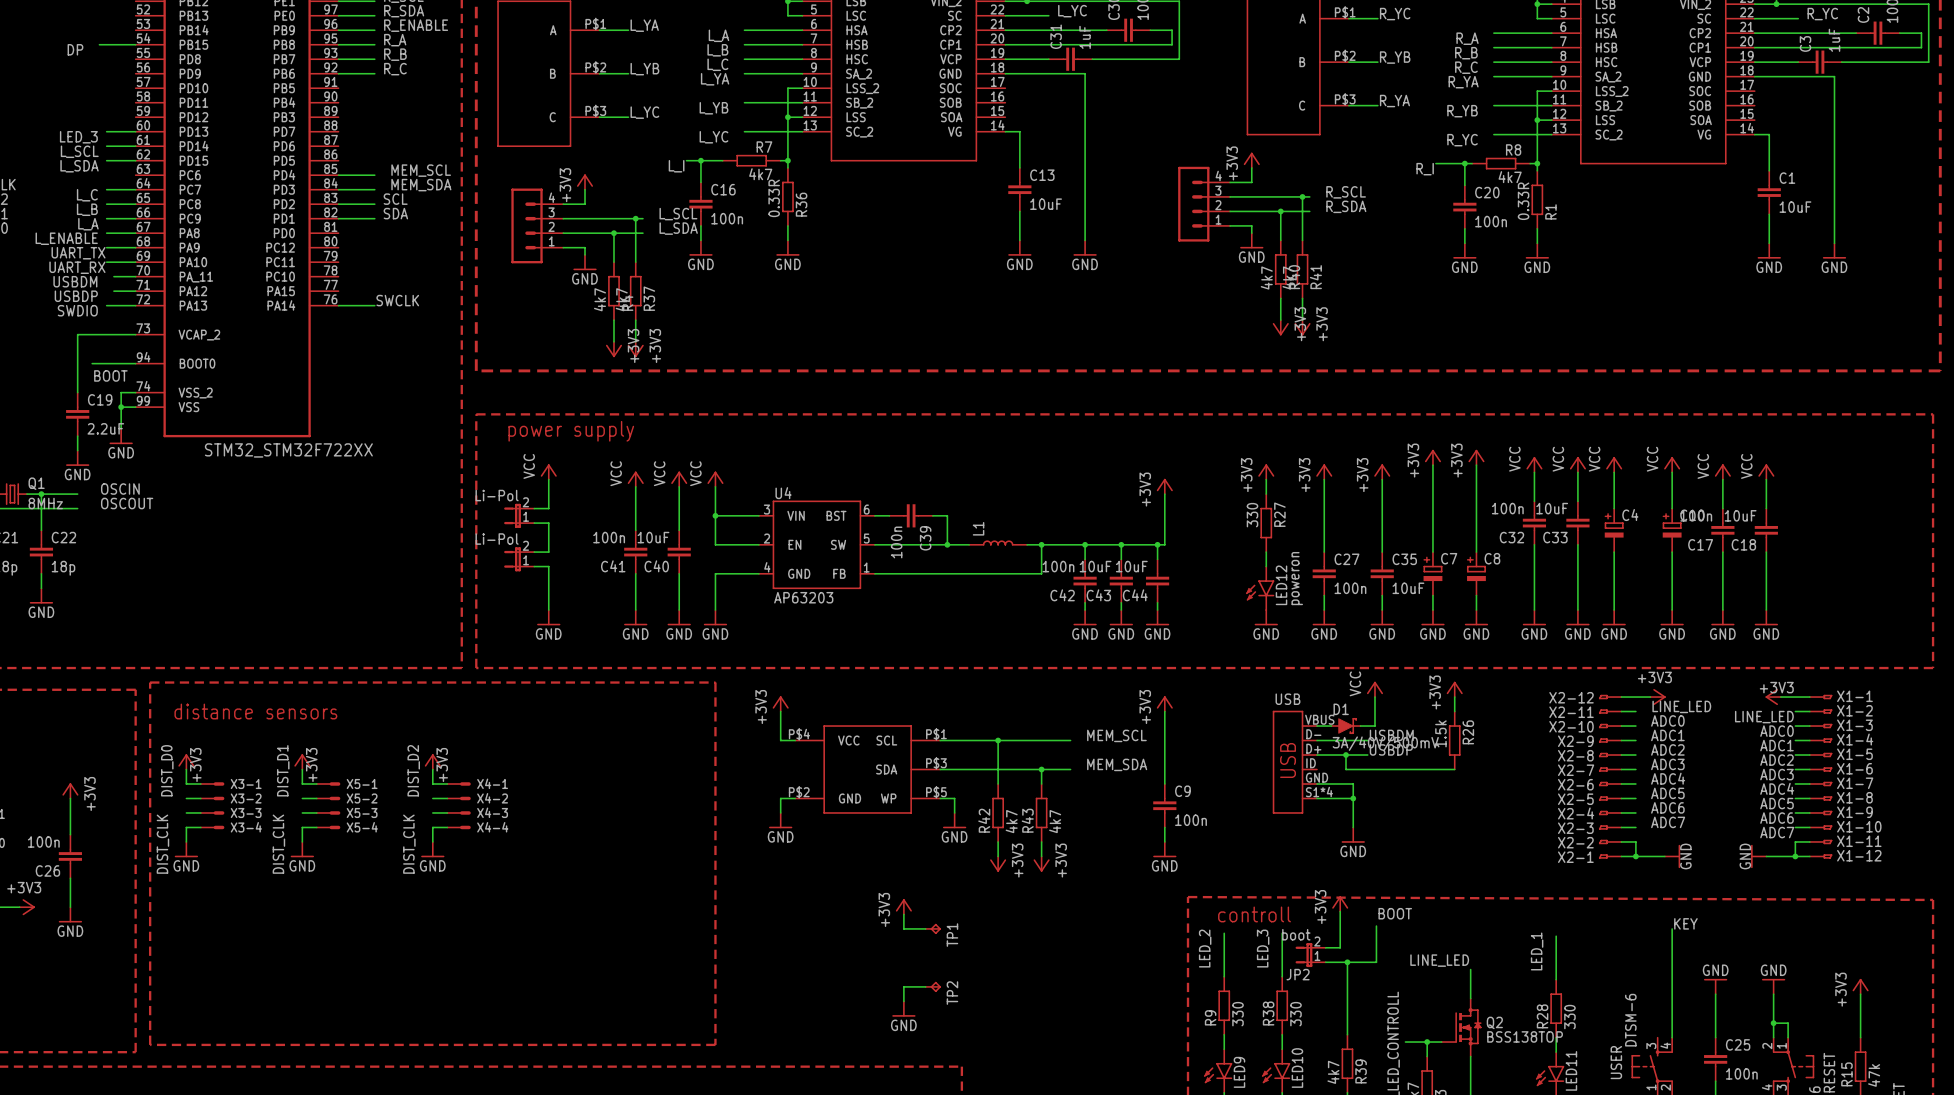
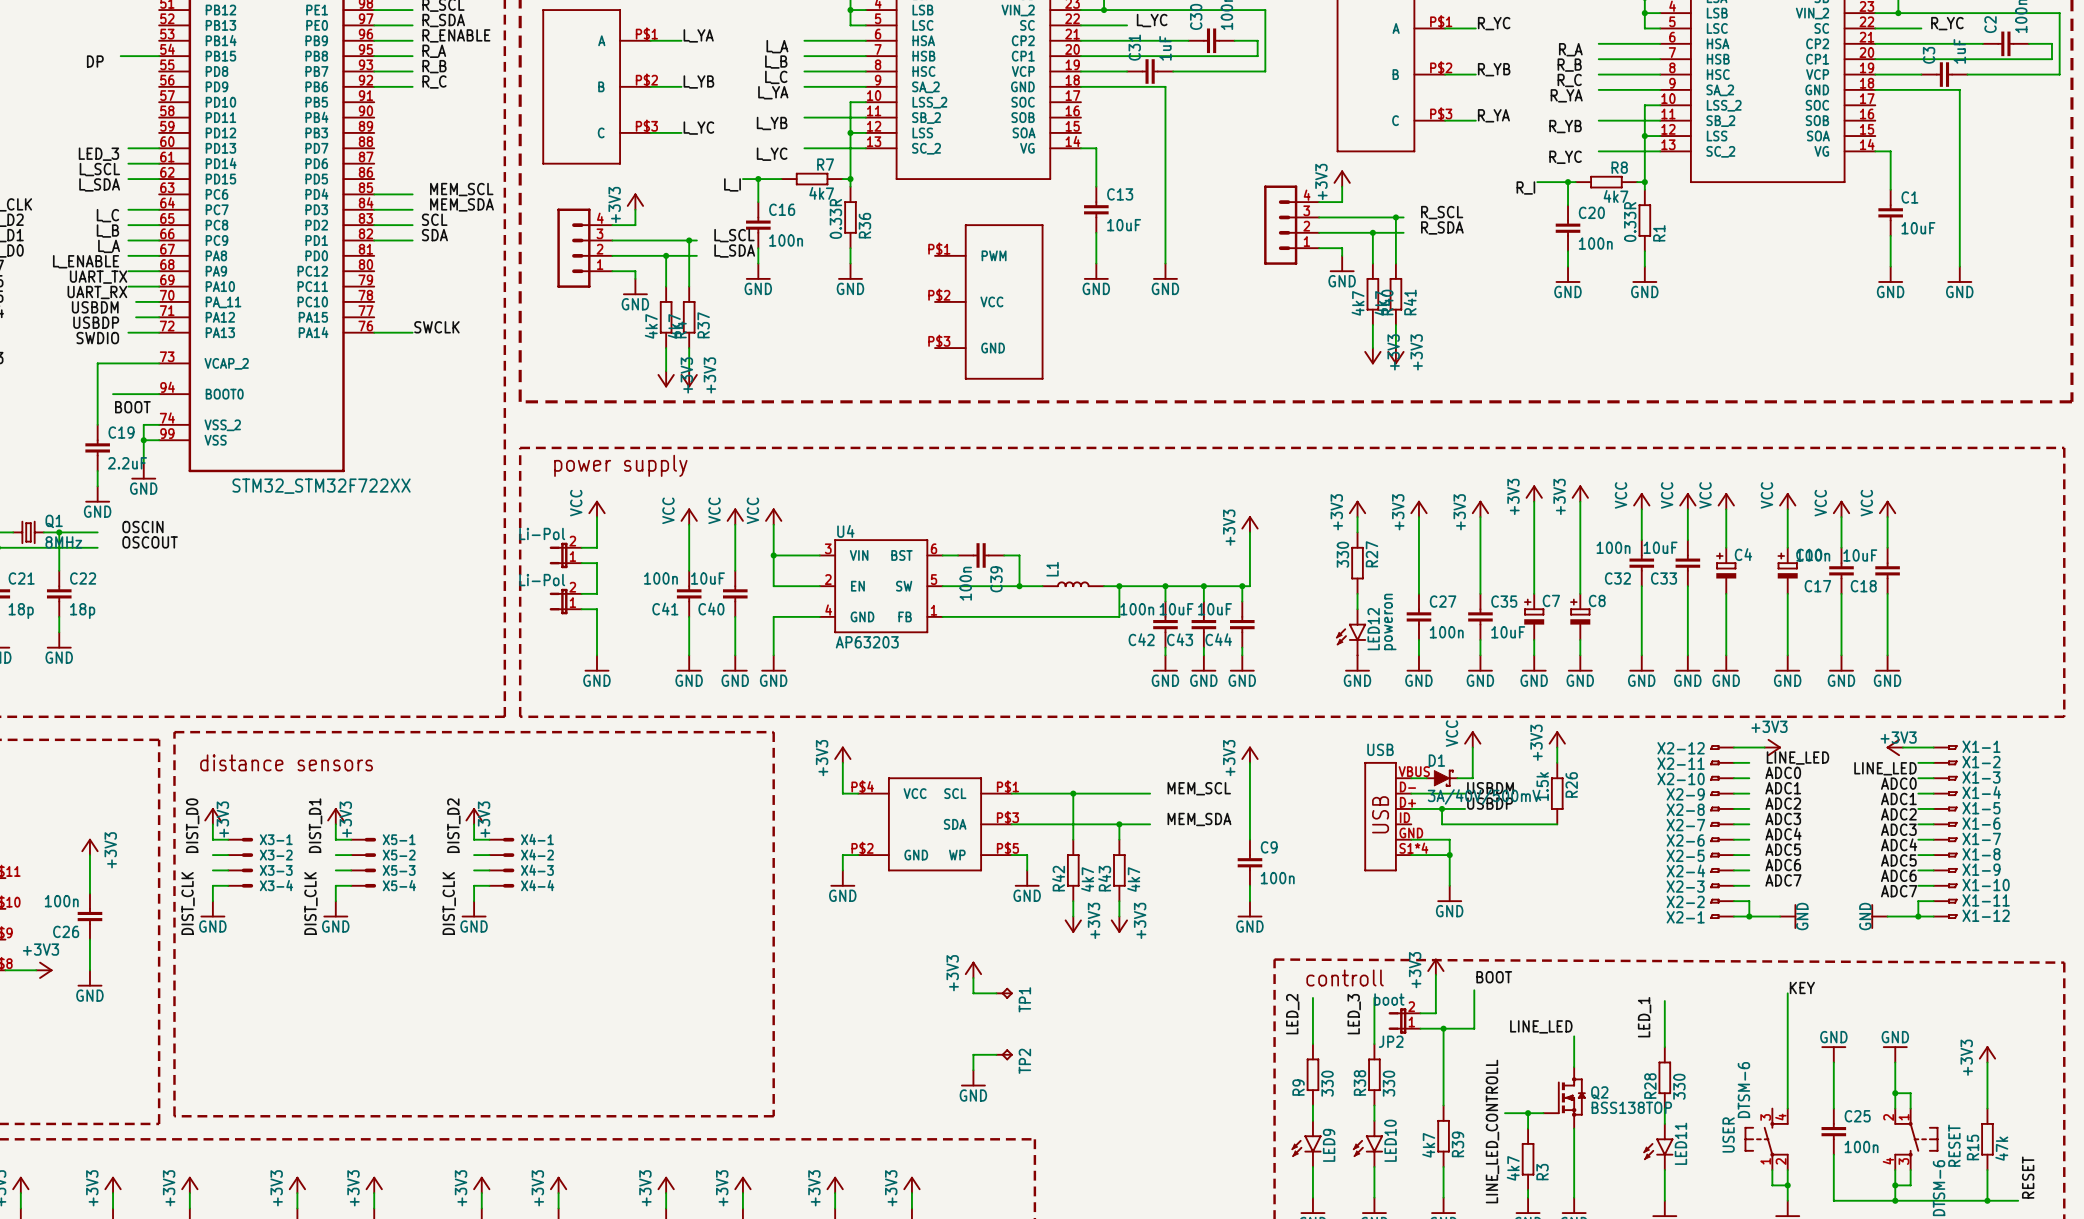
part: none -> (989, 301)

